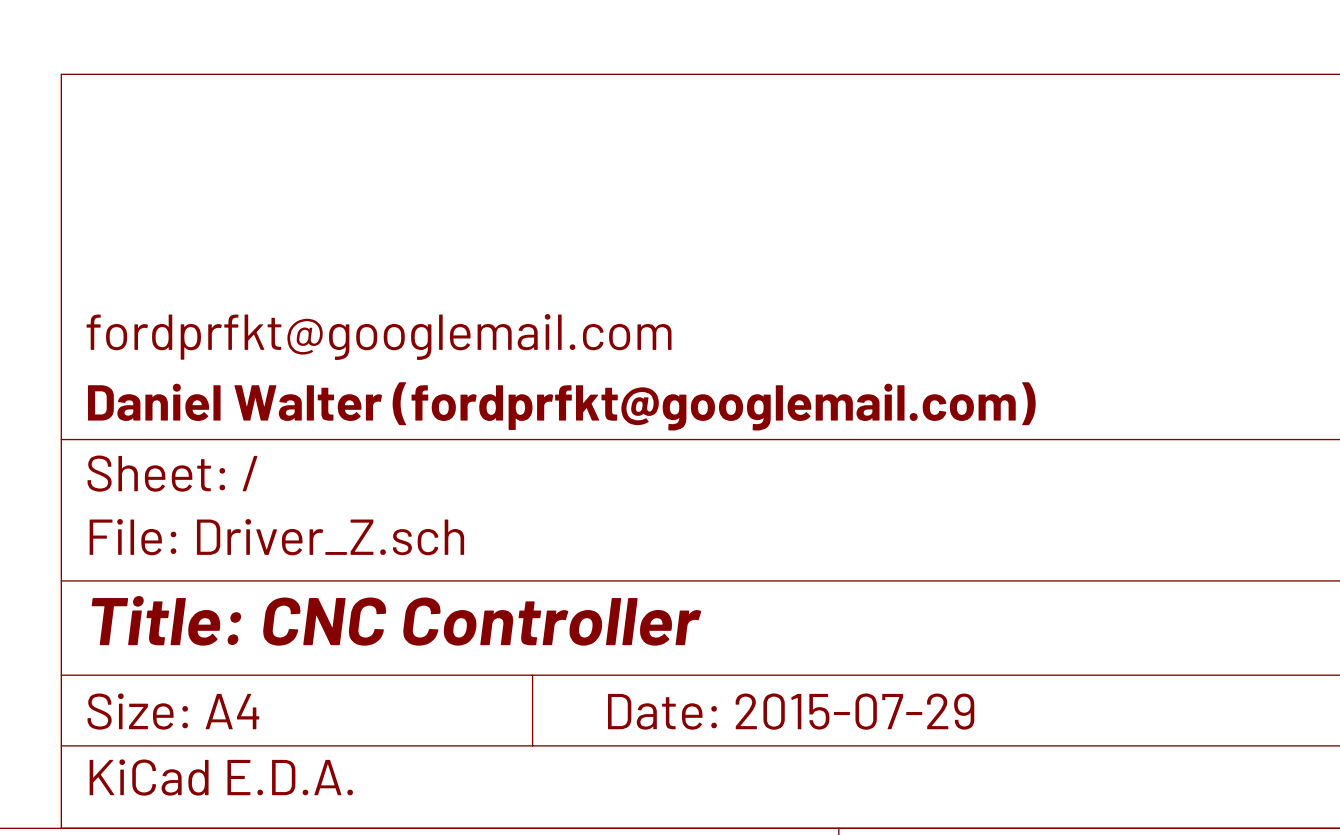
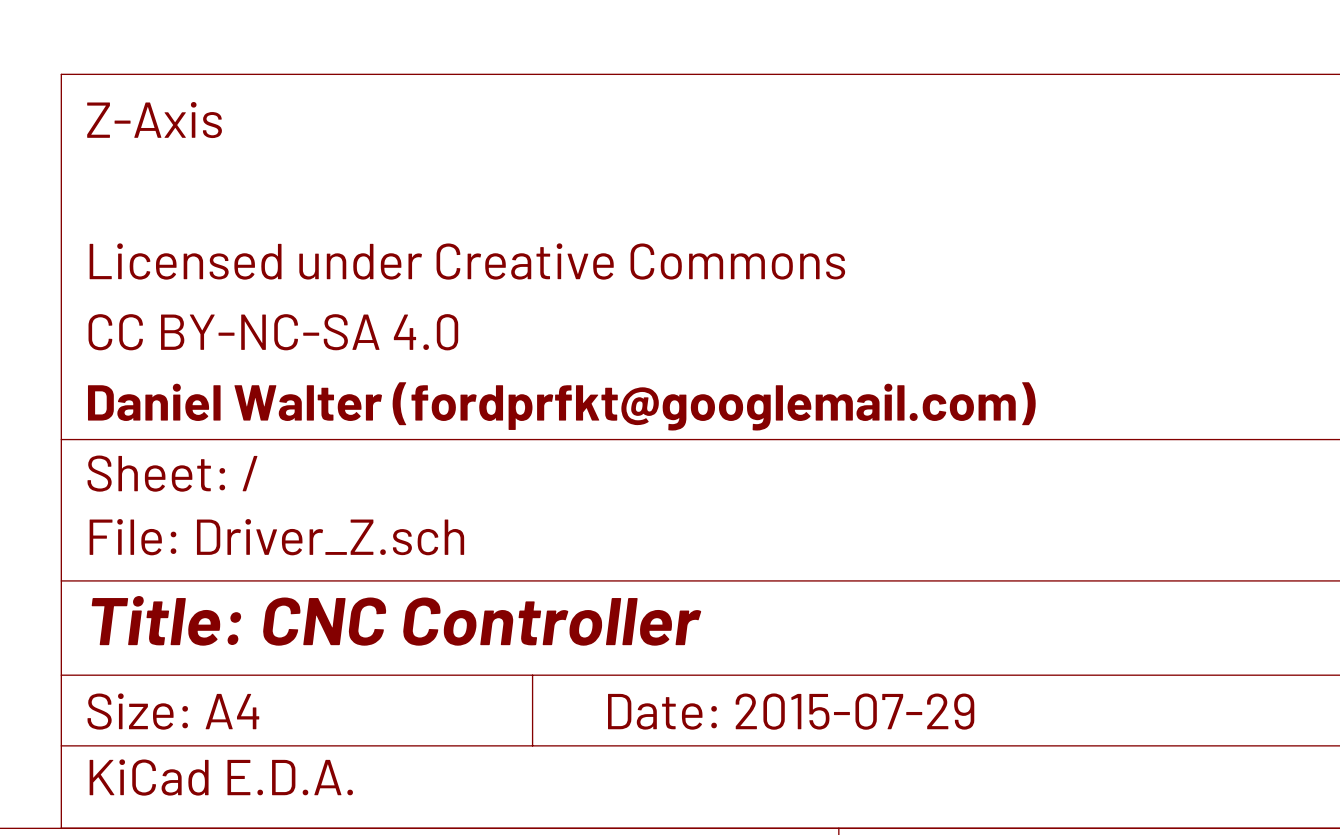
title block: none -> Z-Axis (154, 120)
title block: none -> Licensed under Creative Commons (467, 261)
title block: fordprfkt@googlemail.com (379, 336) -> CC BY-NC-SA 4.0 (273, 332)

